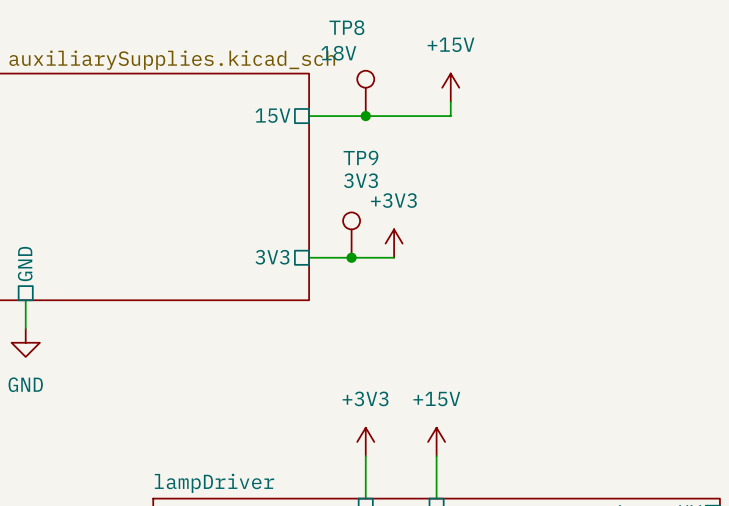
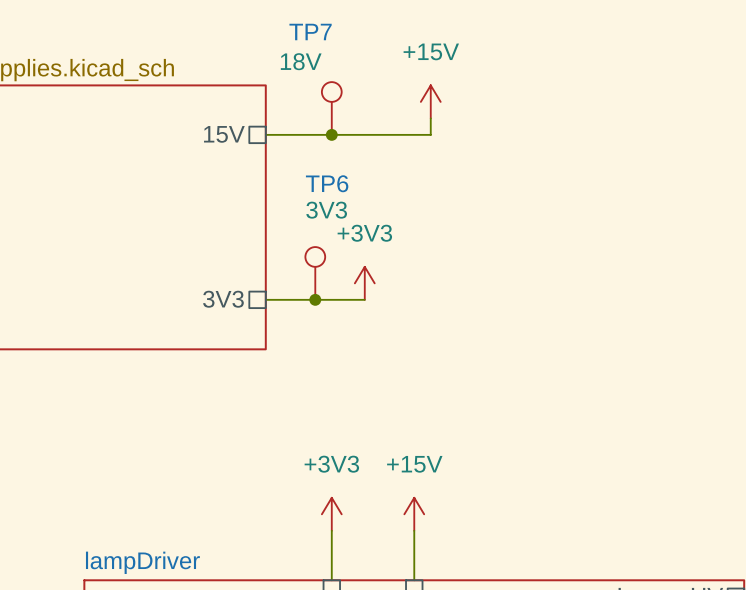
TP8 name: TP8 (346, 27) -> TP7 (310, 32)
TP9 name: TP9 (360, 157) -> TP6 (327, 183)

